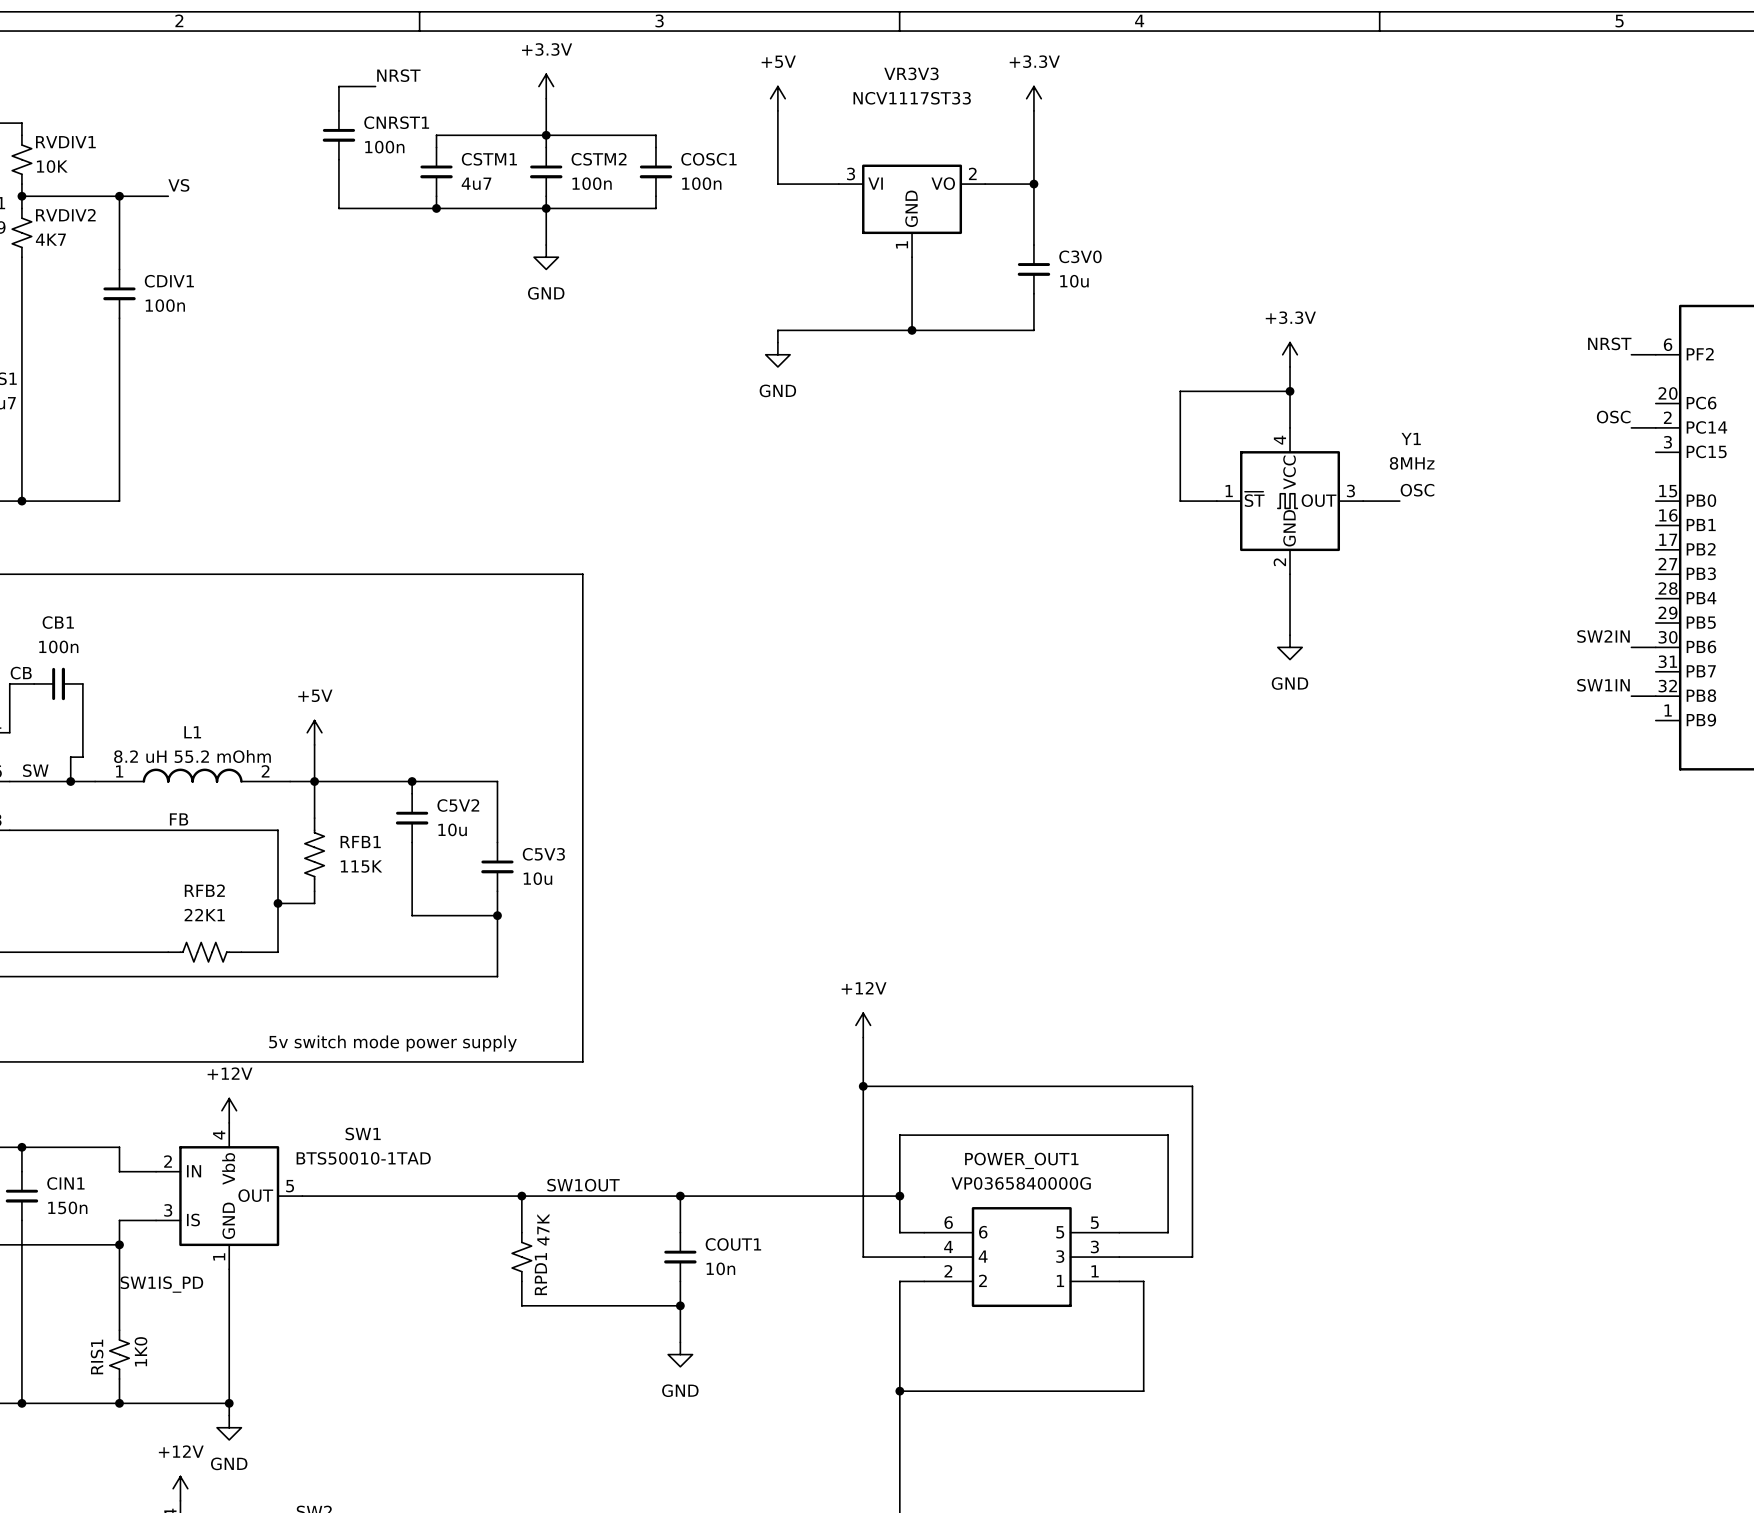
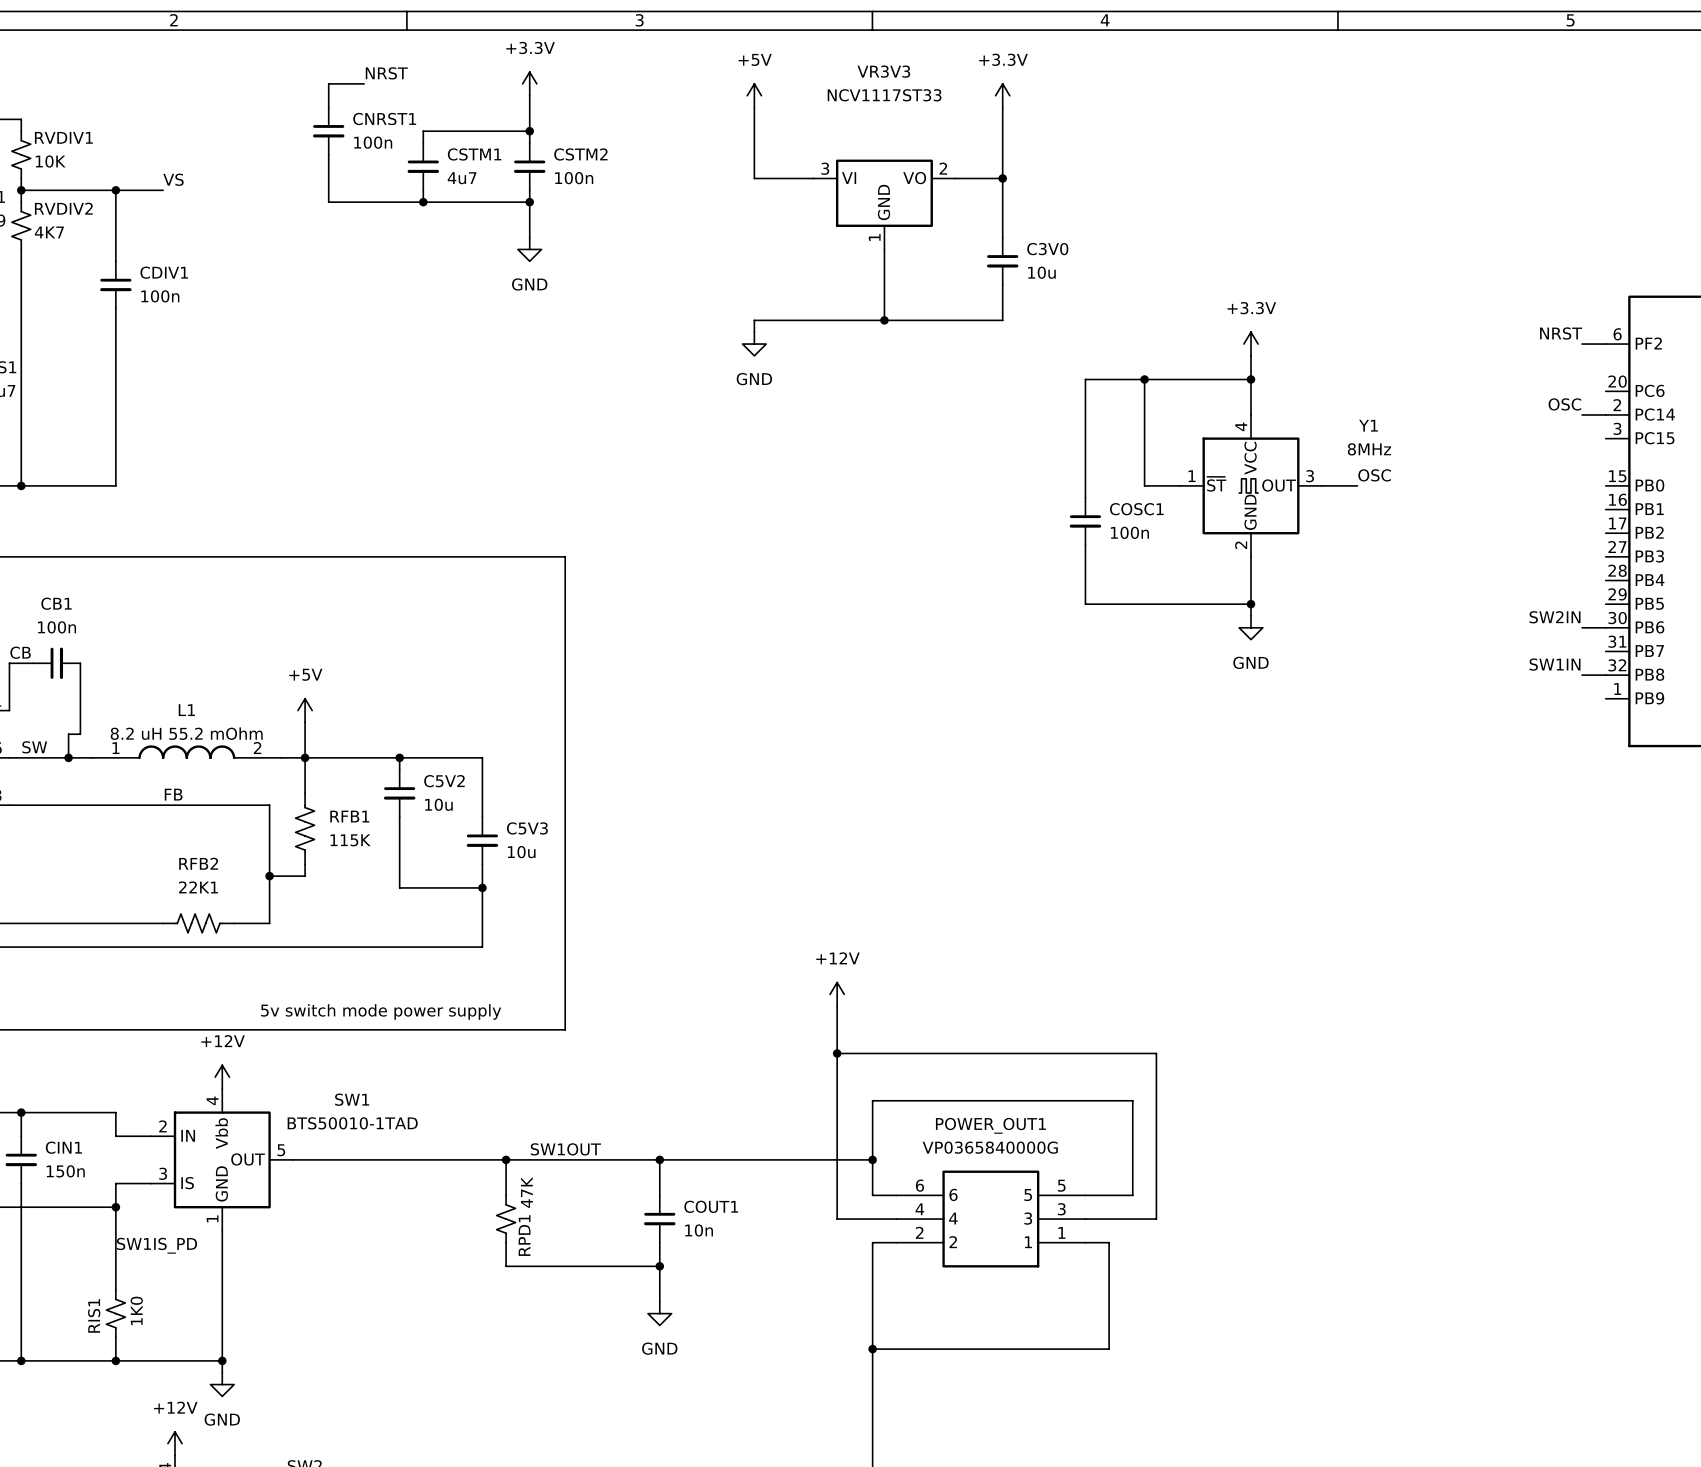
wire: (546, 135) (655, 135) (655, 147) -> none
COSC1 position: (655, 171) -> (1085, 521)
wire: (655, 196) (655, 208) (546, 208) -> none
wire: none -> (1144, 379) (1085, 379) (1085, 497)
junction: none -> (1144, 379)
wire: none -> (1085, 545) (1085, 604) (1251, 604)
junction: none -> (1251, 604)

